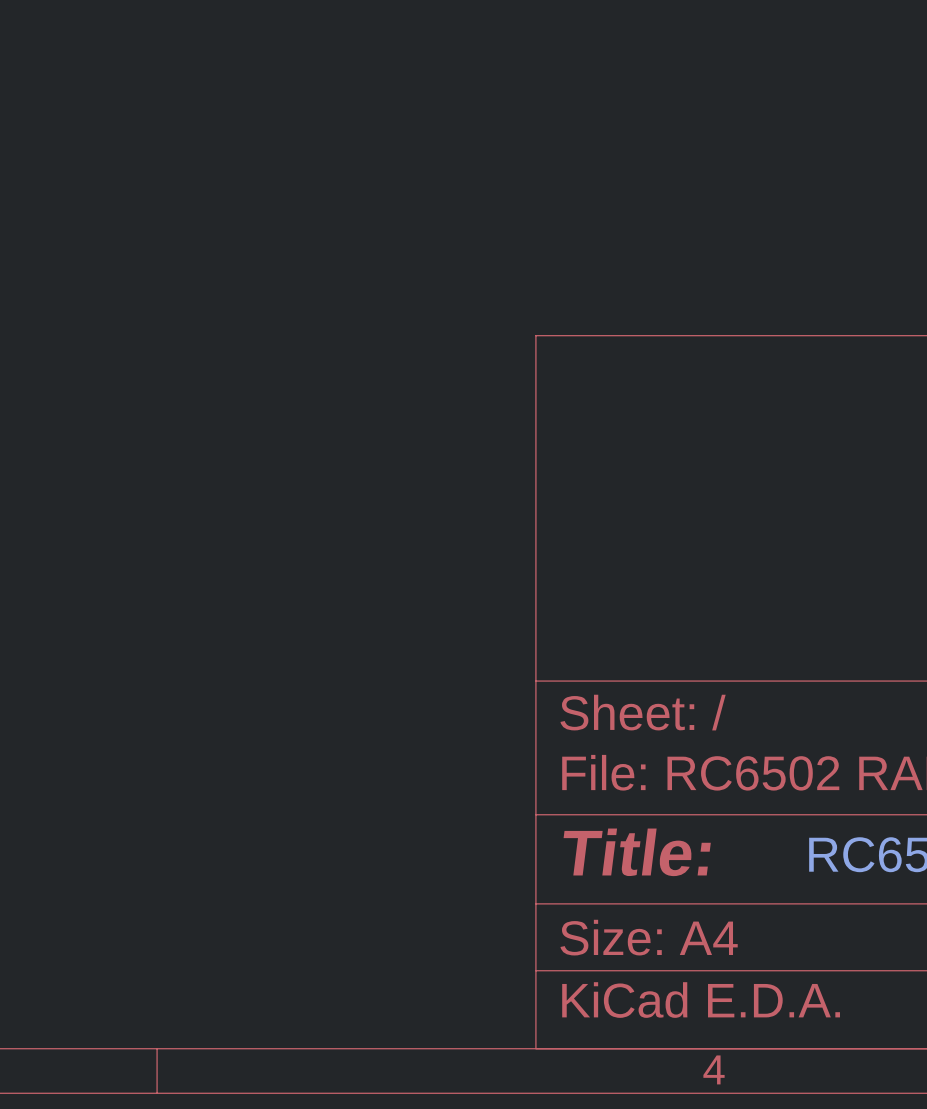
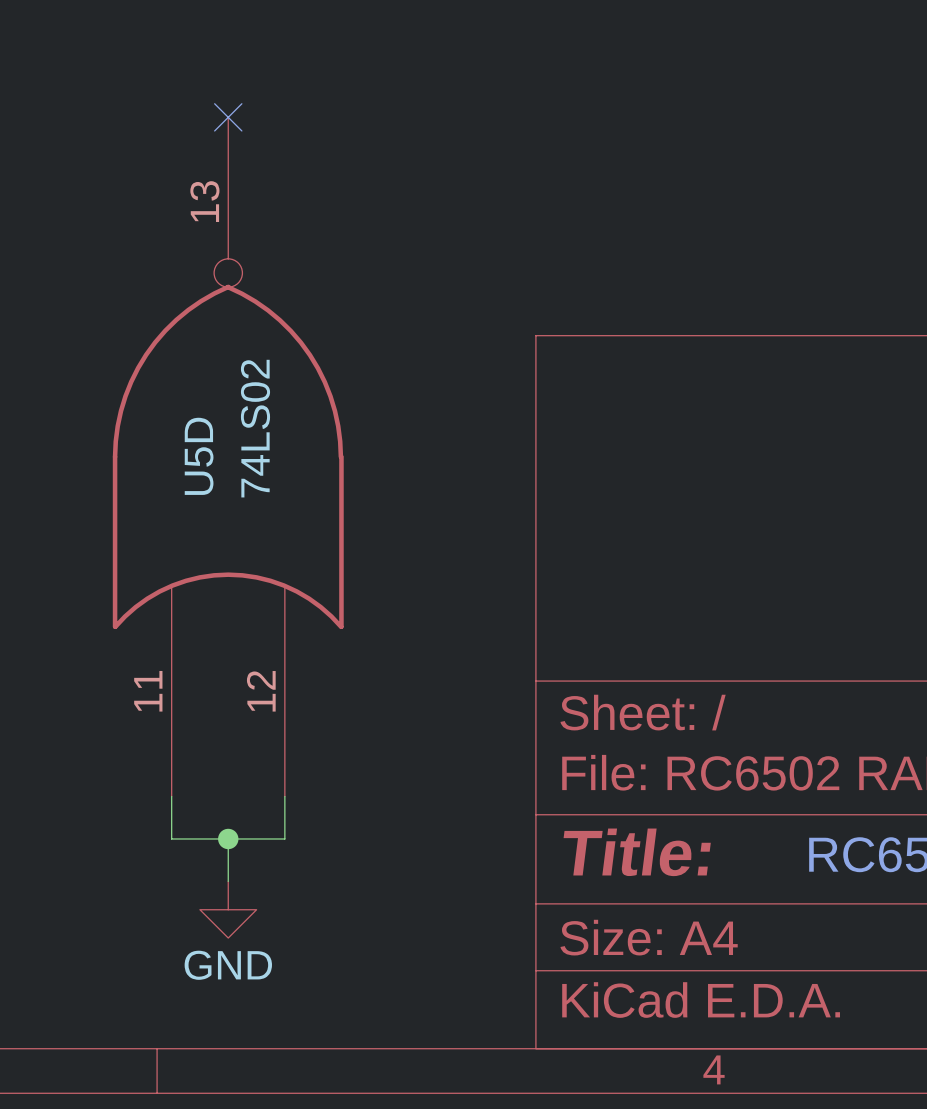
no-connect mark: none -> (228, 117)
U5D: none -> 74LS02 (228, 456)
wire: none -> (171, 796) (171, 838) (284, 838) (284, 796)
wire: none -> (228, 838) (228, 881)
junction: none -> (228, 838)
power symbol: none -> GND (228, 909)

